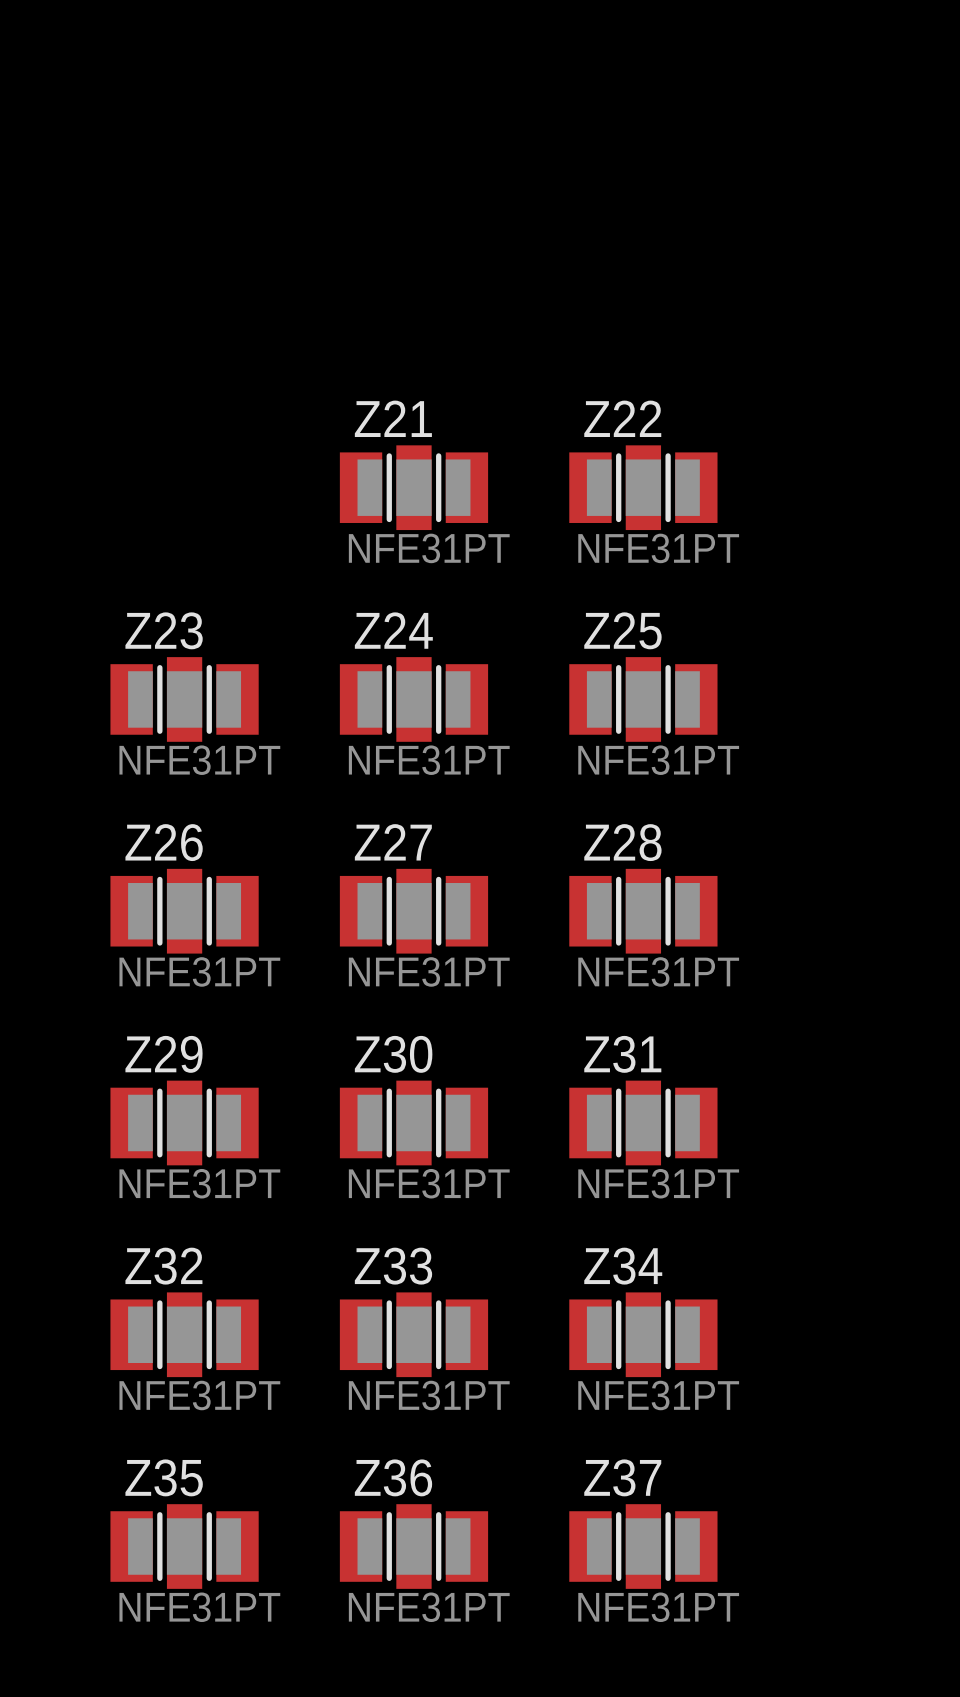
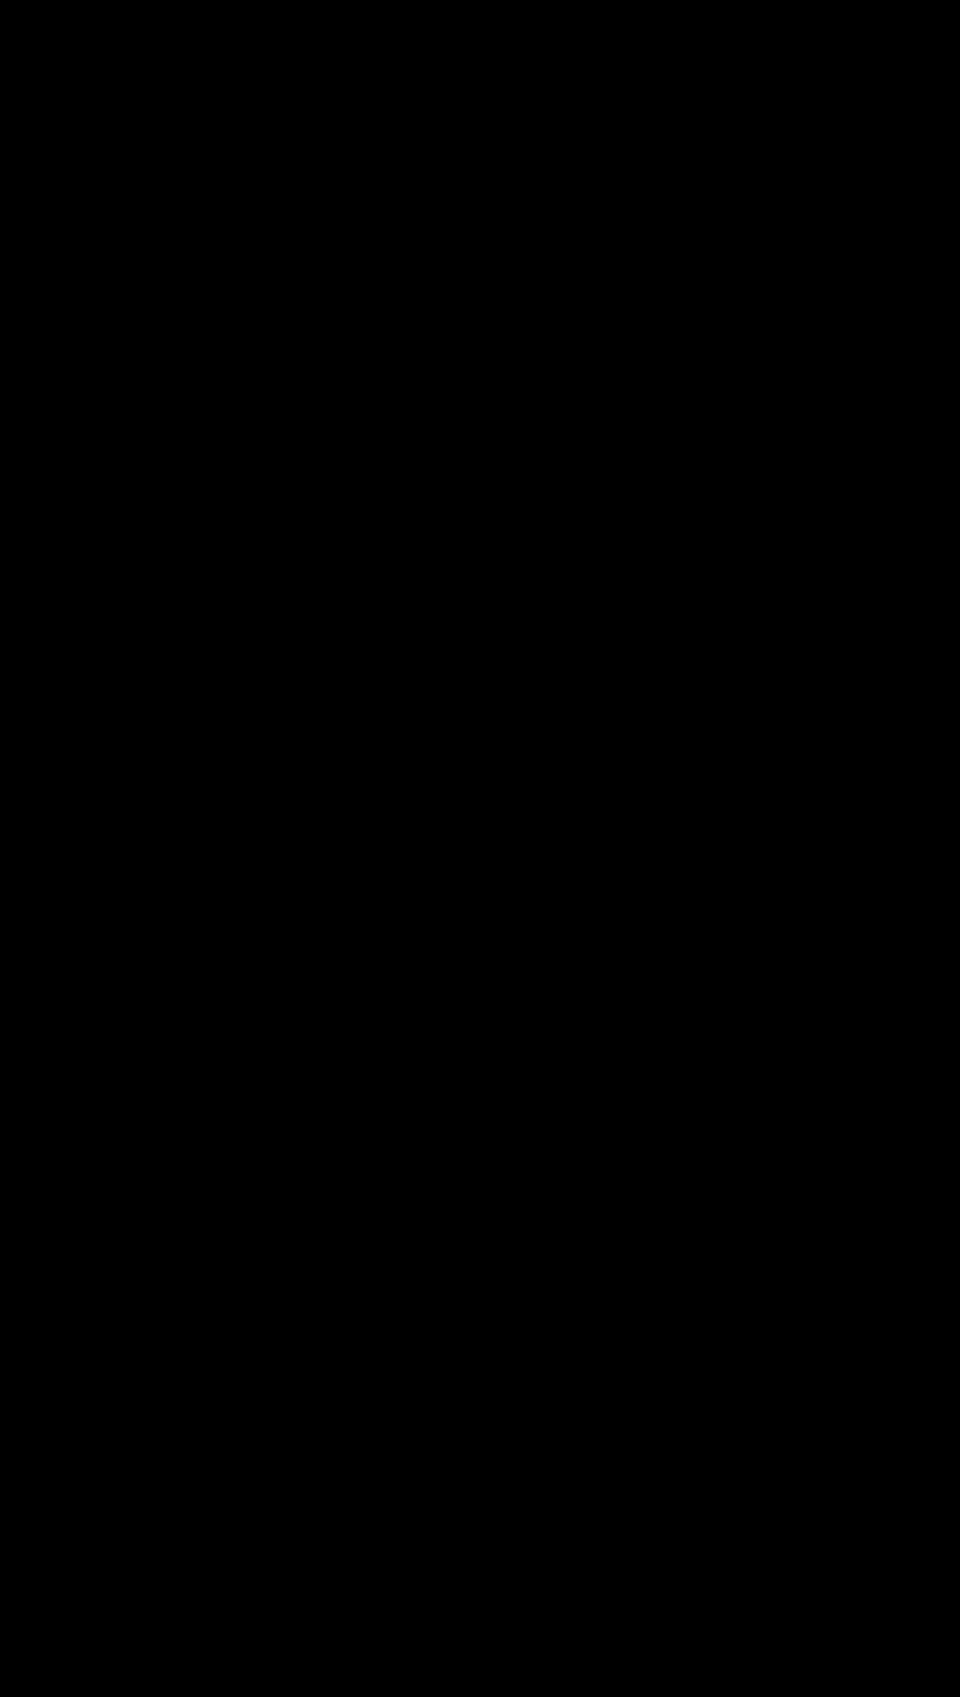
Z21: NFE31PT (413, 487) -> none
Z22: NFE31PT (643, 487) -> none
Z23: NFE31PT (184, 699) -> none
Z24: NFE31PT (413, 699) -> none
Z25: NFE31PT (643, 699) -> none
Z26: NFE31PT (184, 911) -> none
Z27: NFE31PT (413, 911) -> none
Z28: NFE31PT (643, 911) -> none
Z29: NFE31PT (184, 1122) -> none
Z30: NFE31PT (413, 1122) -> none
Z31: NFE31PT (643, 1122) -> none
Z32: NFE31PT (184, 1334) -> none
Z33: NFE31PT (413, 1334) -> none
Z34: NFE31PT (643, 1334) -> none
Z35: NFE31PT (184, 1546) -> none
Z36: NFE31PT (413, 1546) -> none
Z37: NFE31PT (643, 1546) -> none

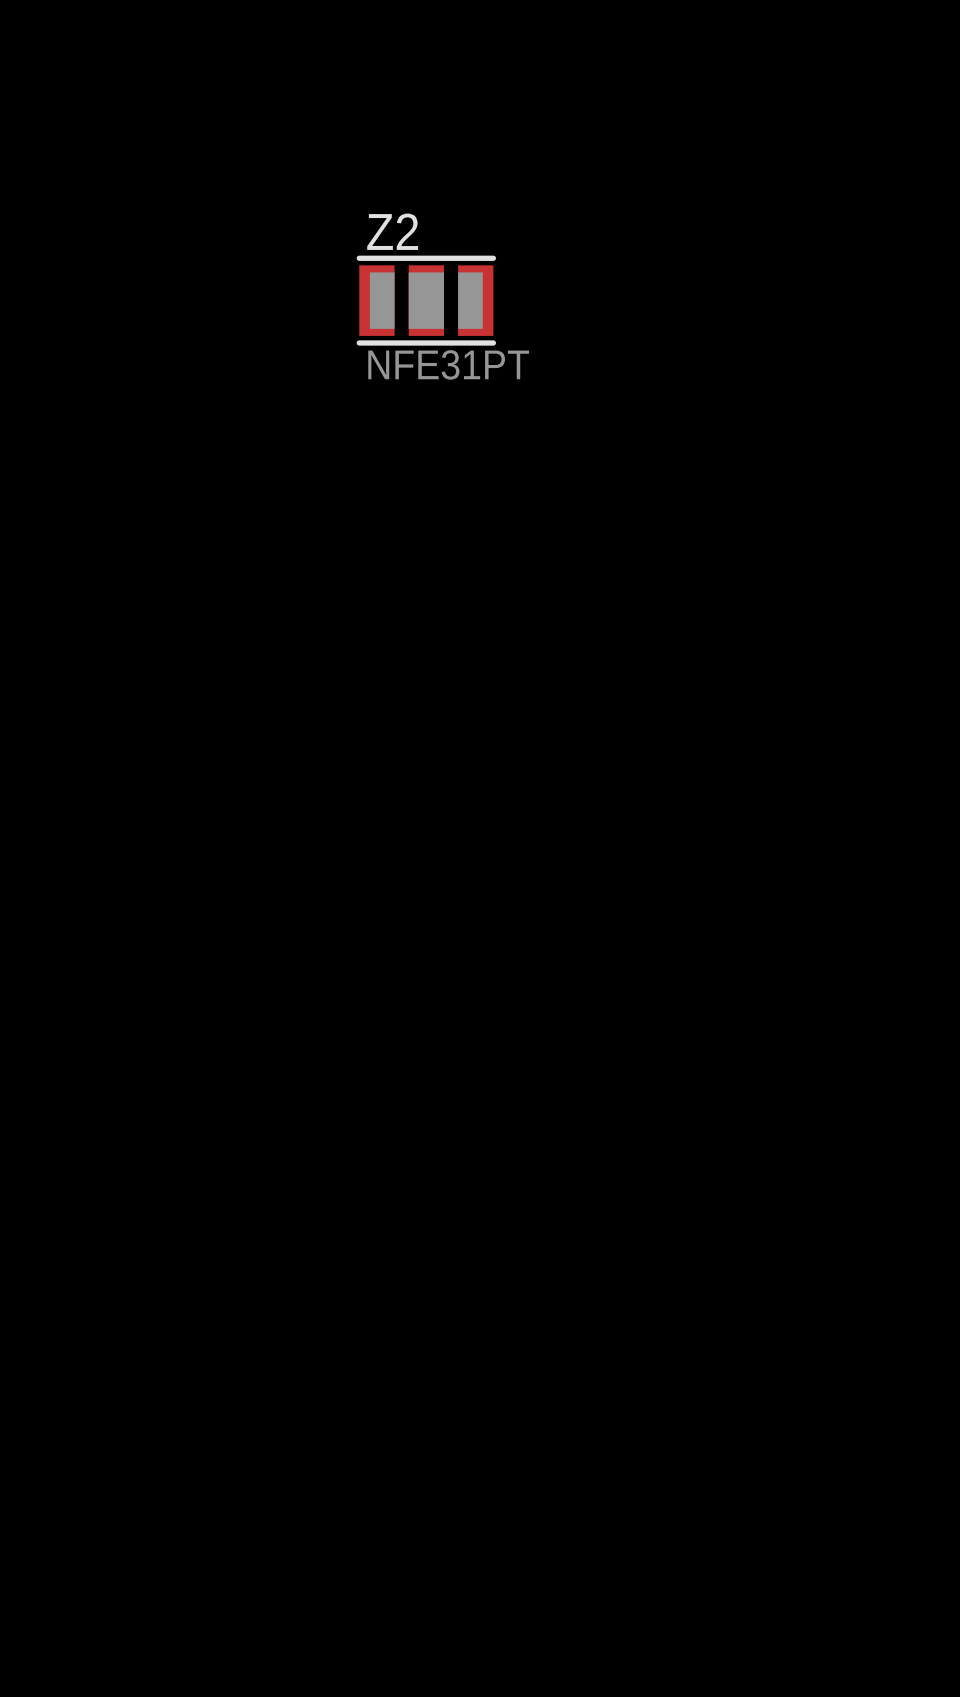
Z2: none -> NFE31PT (426, 300)

